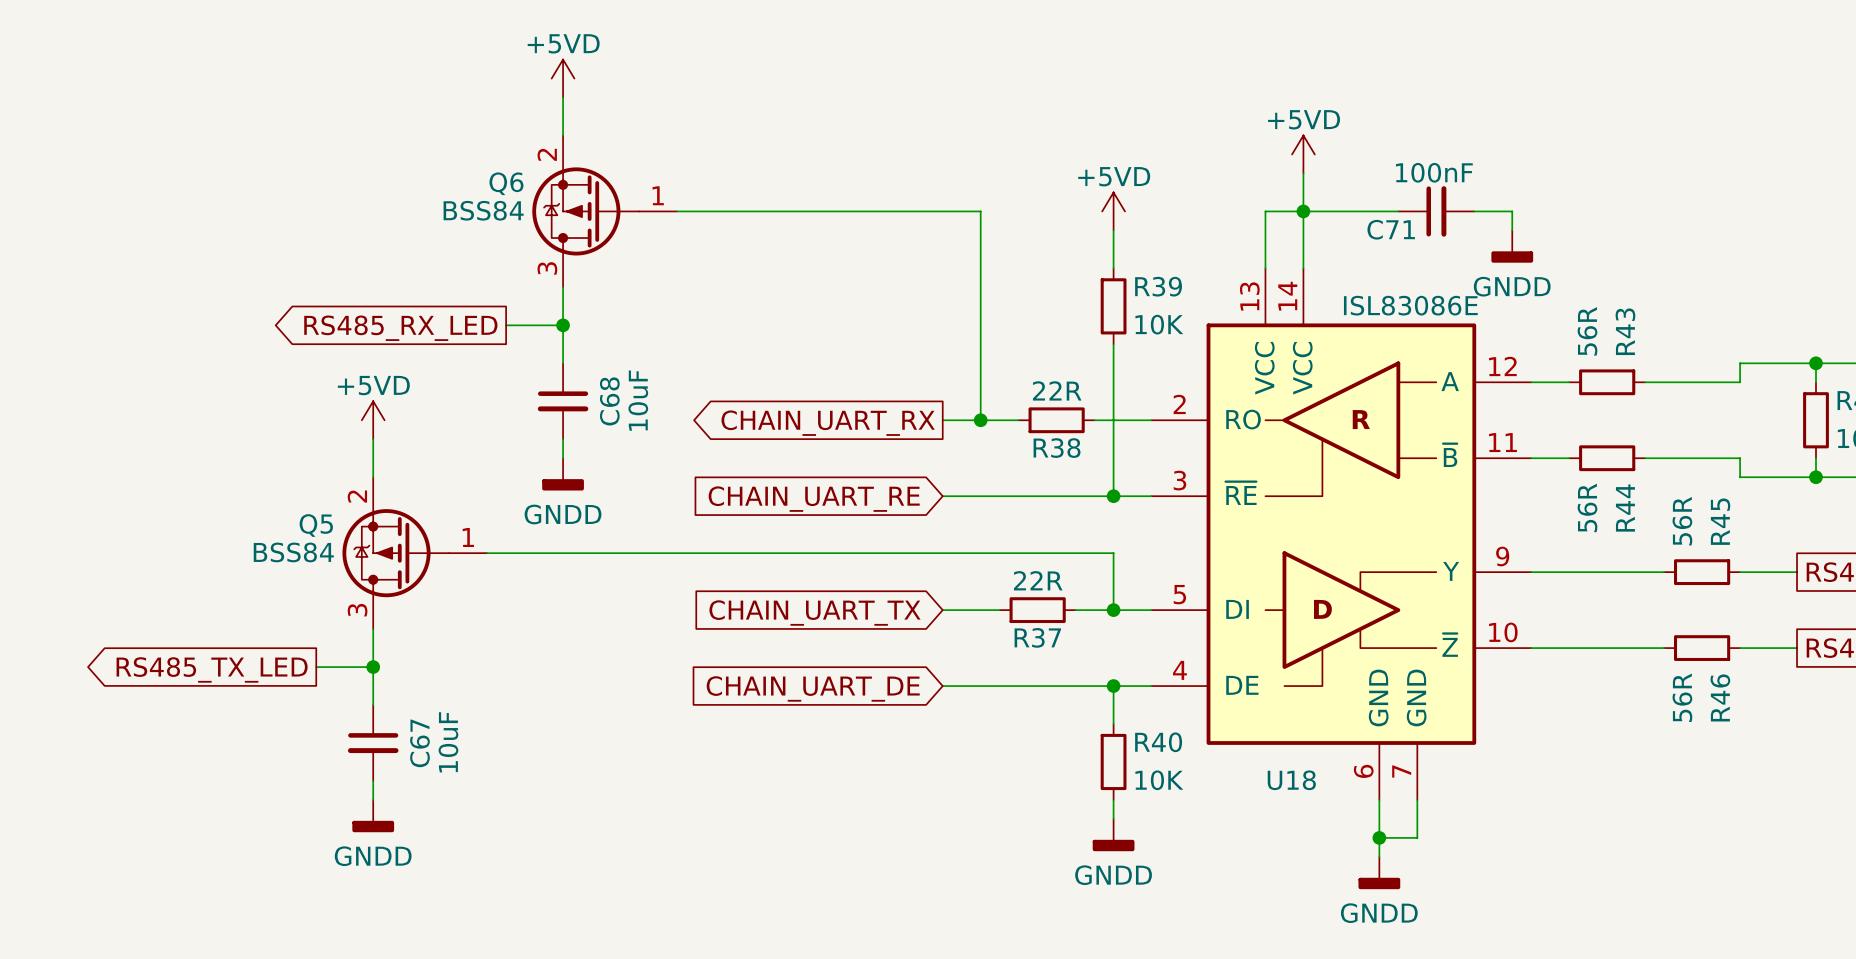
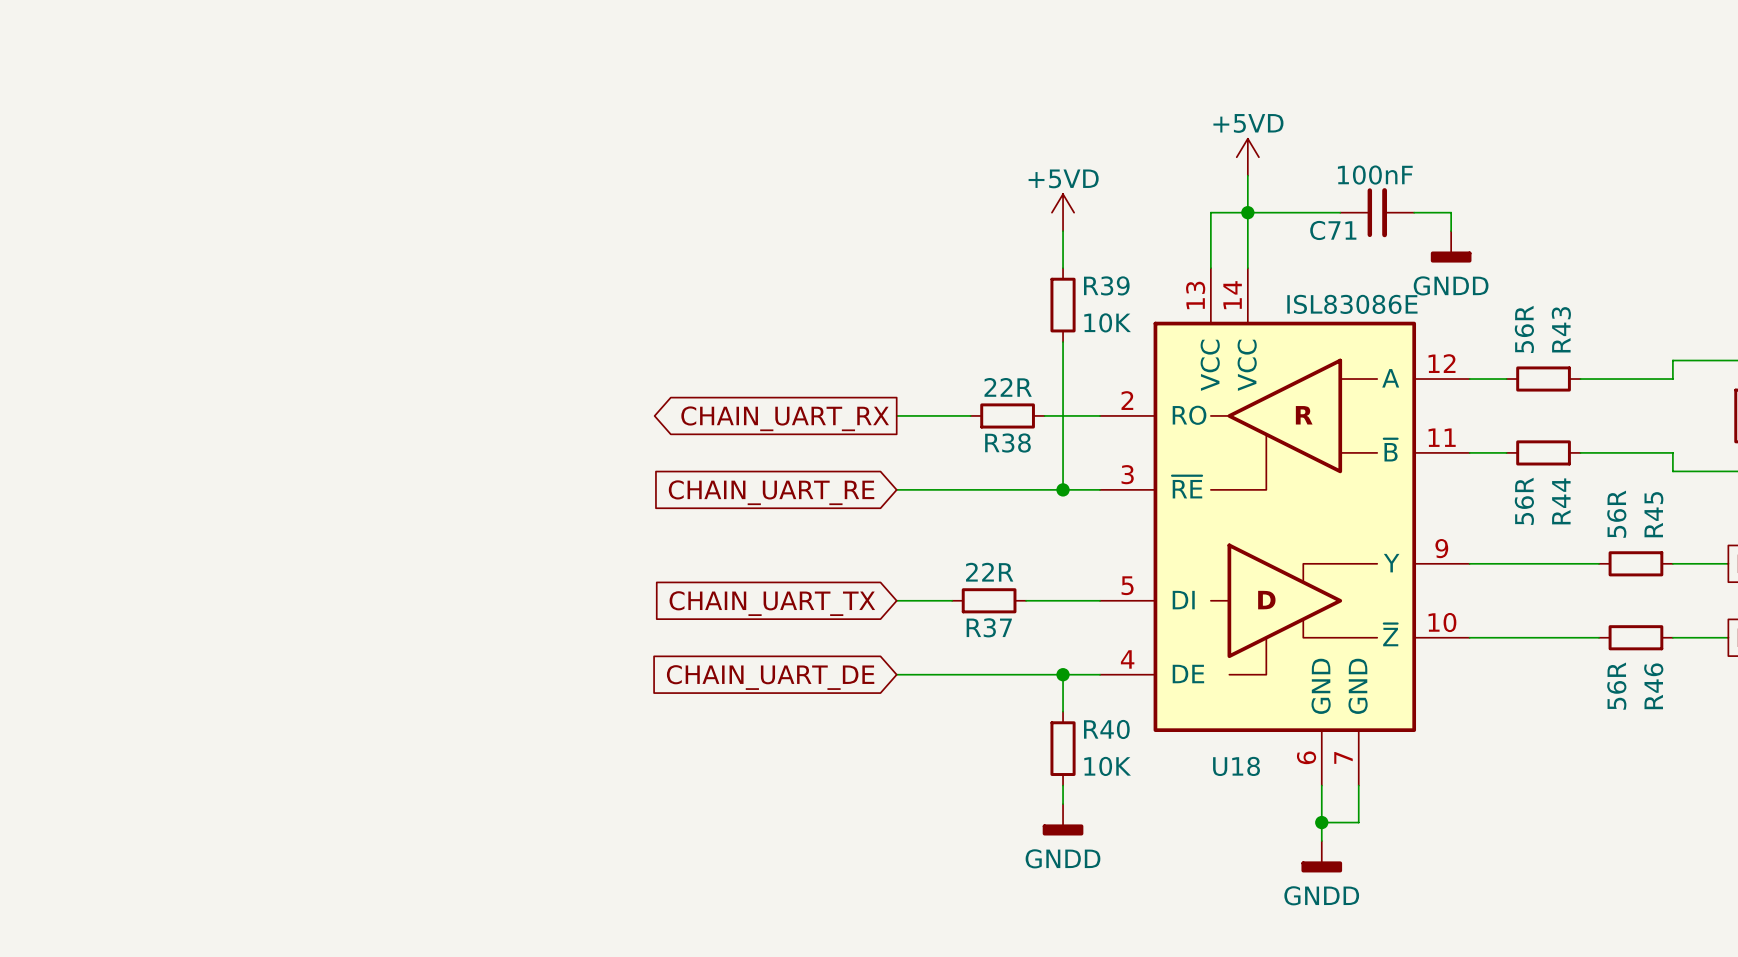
power symbol: +5VD (563, 78) -> none
wire: (563, 97) (563, 135) -> none
Q6: BSS84 (604, 211) -> none
wire: (676, 211) (980, 211) (980, 420) -> none
wire: (563, 287) (563, 363) -> none
wire: (506, 325) (563, 325) -> none
junction: (563, 325) -> none
global label: RS485_RX_LED (400, 328) -> none
C68: 10uF (563, 401) -> none
power symbol: +5VD (373, 420) -> none
junction: (980, 420) -> none
wire: (373, 439) (373, 477) -> none
wire: (563, 439) (563, 458) -> none
power symbol: GNDD (563, 474) -> none
Q5: BSS84 (414, 553) -> none
wire: (487, 553) (1113, 553) (1113, 610) -> none
junction: (1113, 610) -> none
wire: (373, 629) (373, 705) -> none
wire: (316, 667) (373, 667) -> none
junction: (373, 667) -> none
global label: RS485_TX_LED (212, 669) -> none
C67: 10uF (373, 742) -> none
wire: (373, 780) (373, 799) -> none
power symbol: GNDD (373, 816) -> none

